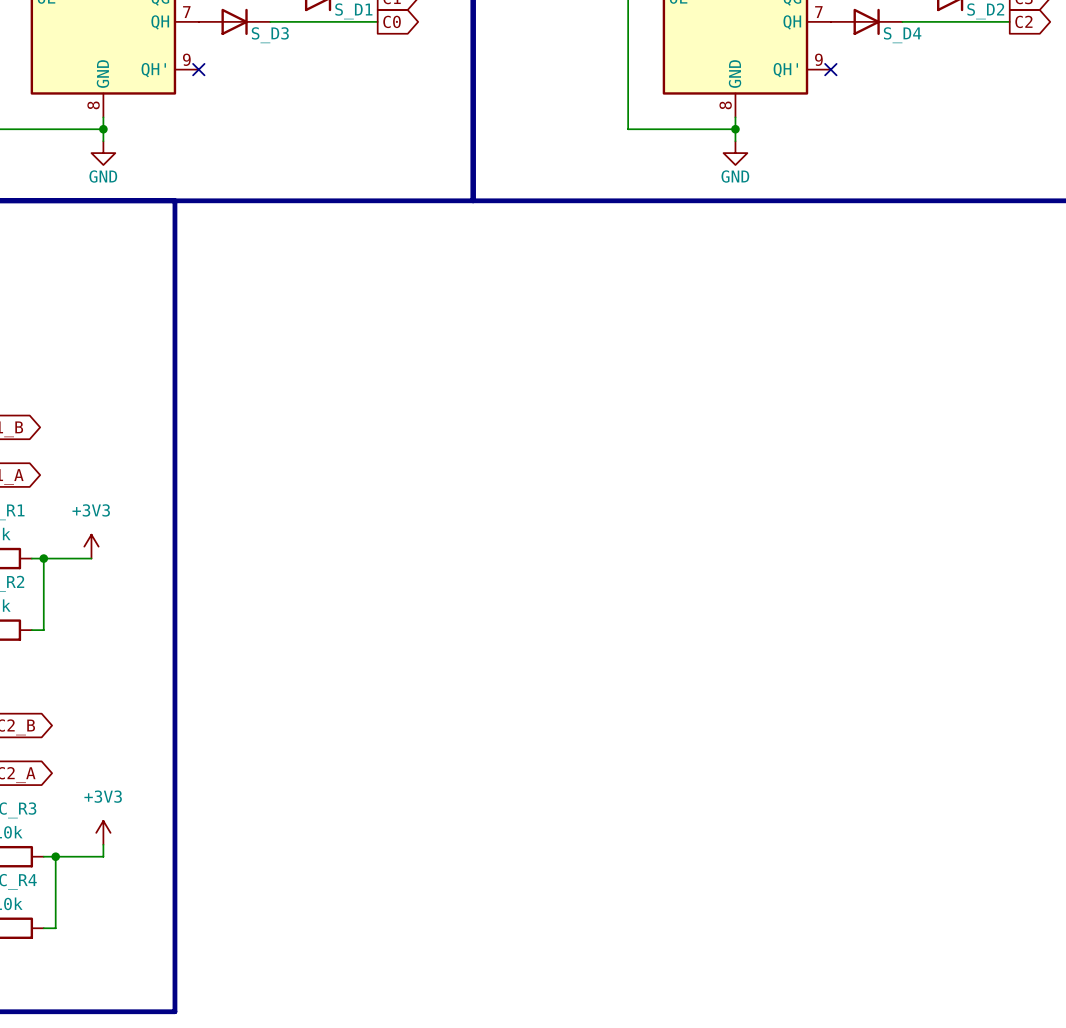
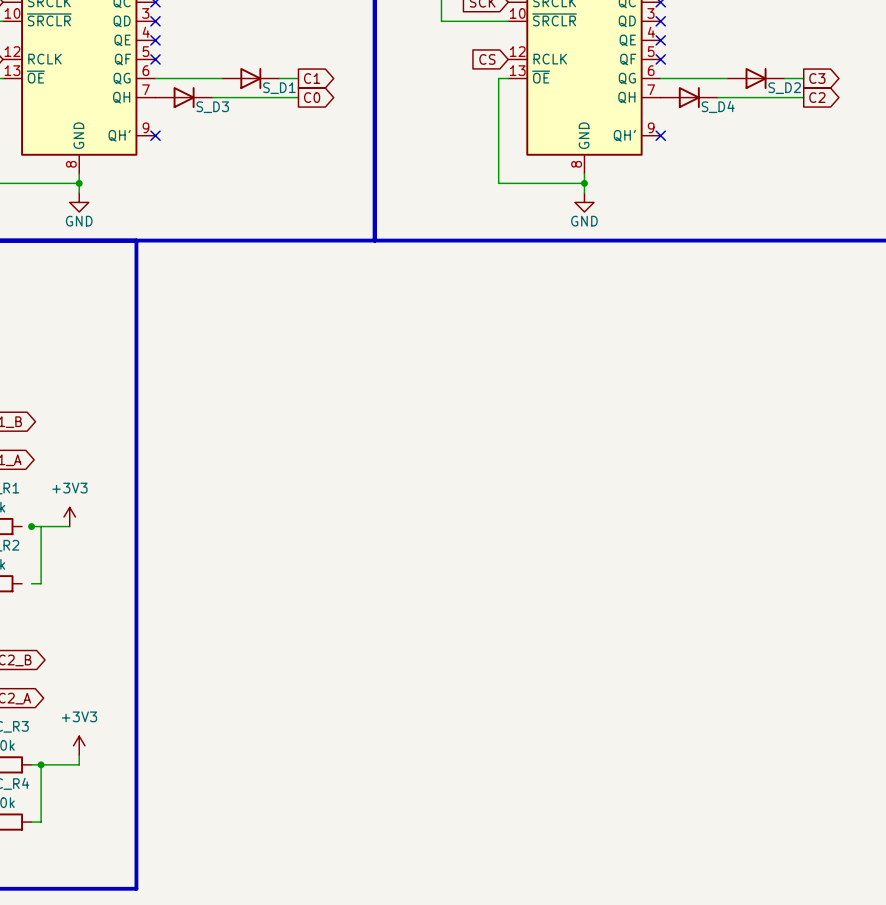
wire: (31, 558) (43, 558) (43, 630) (31, 630) -> none
wire: none -> (41, 526) (41, 583) (31, 583)

